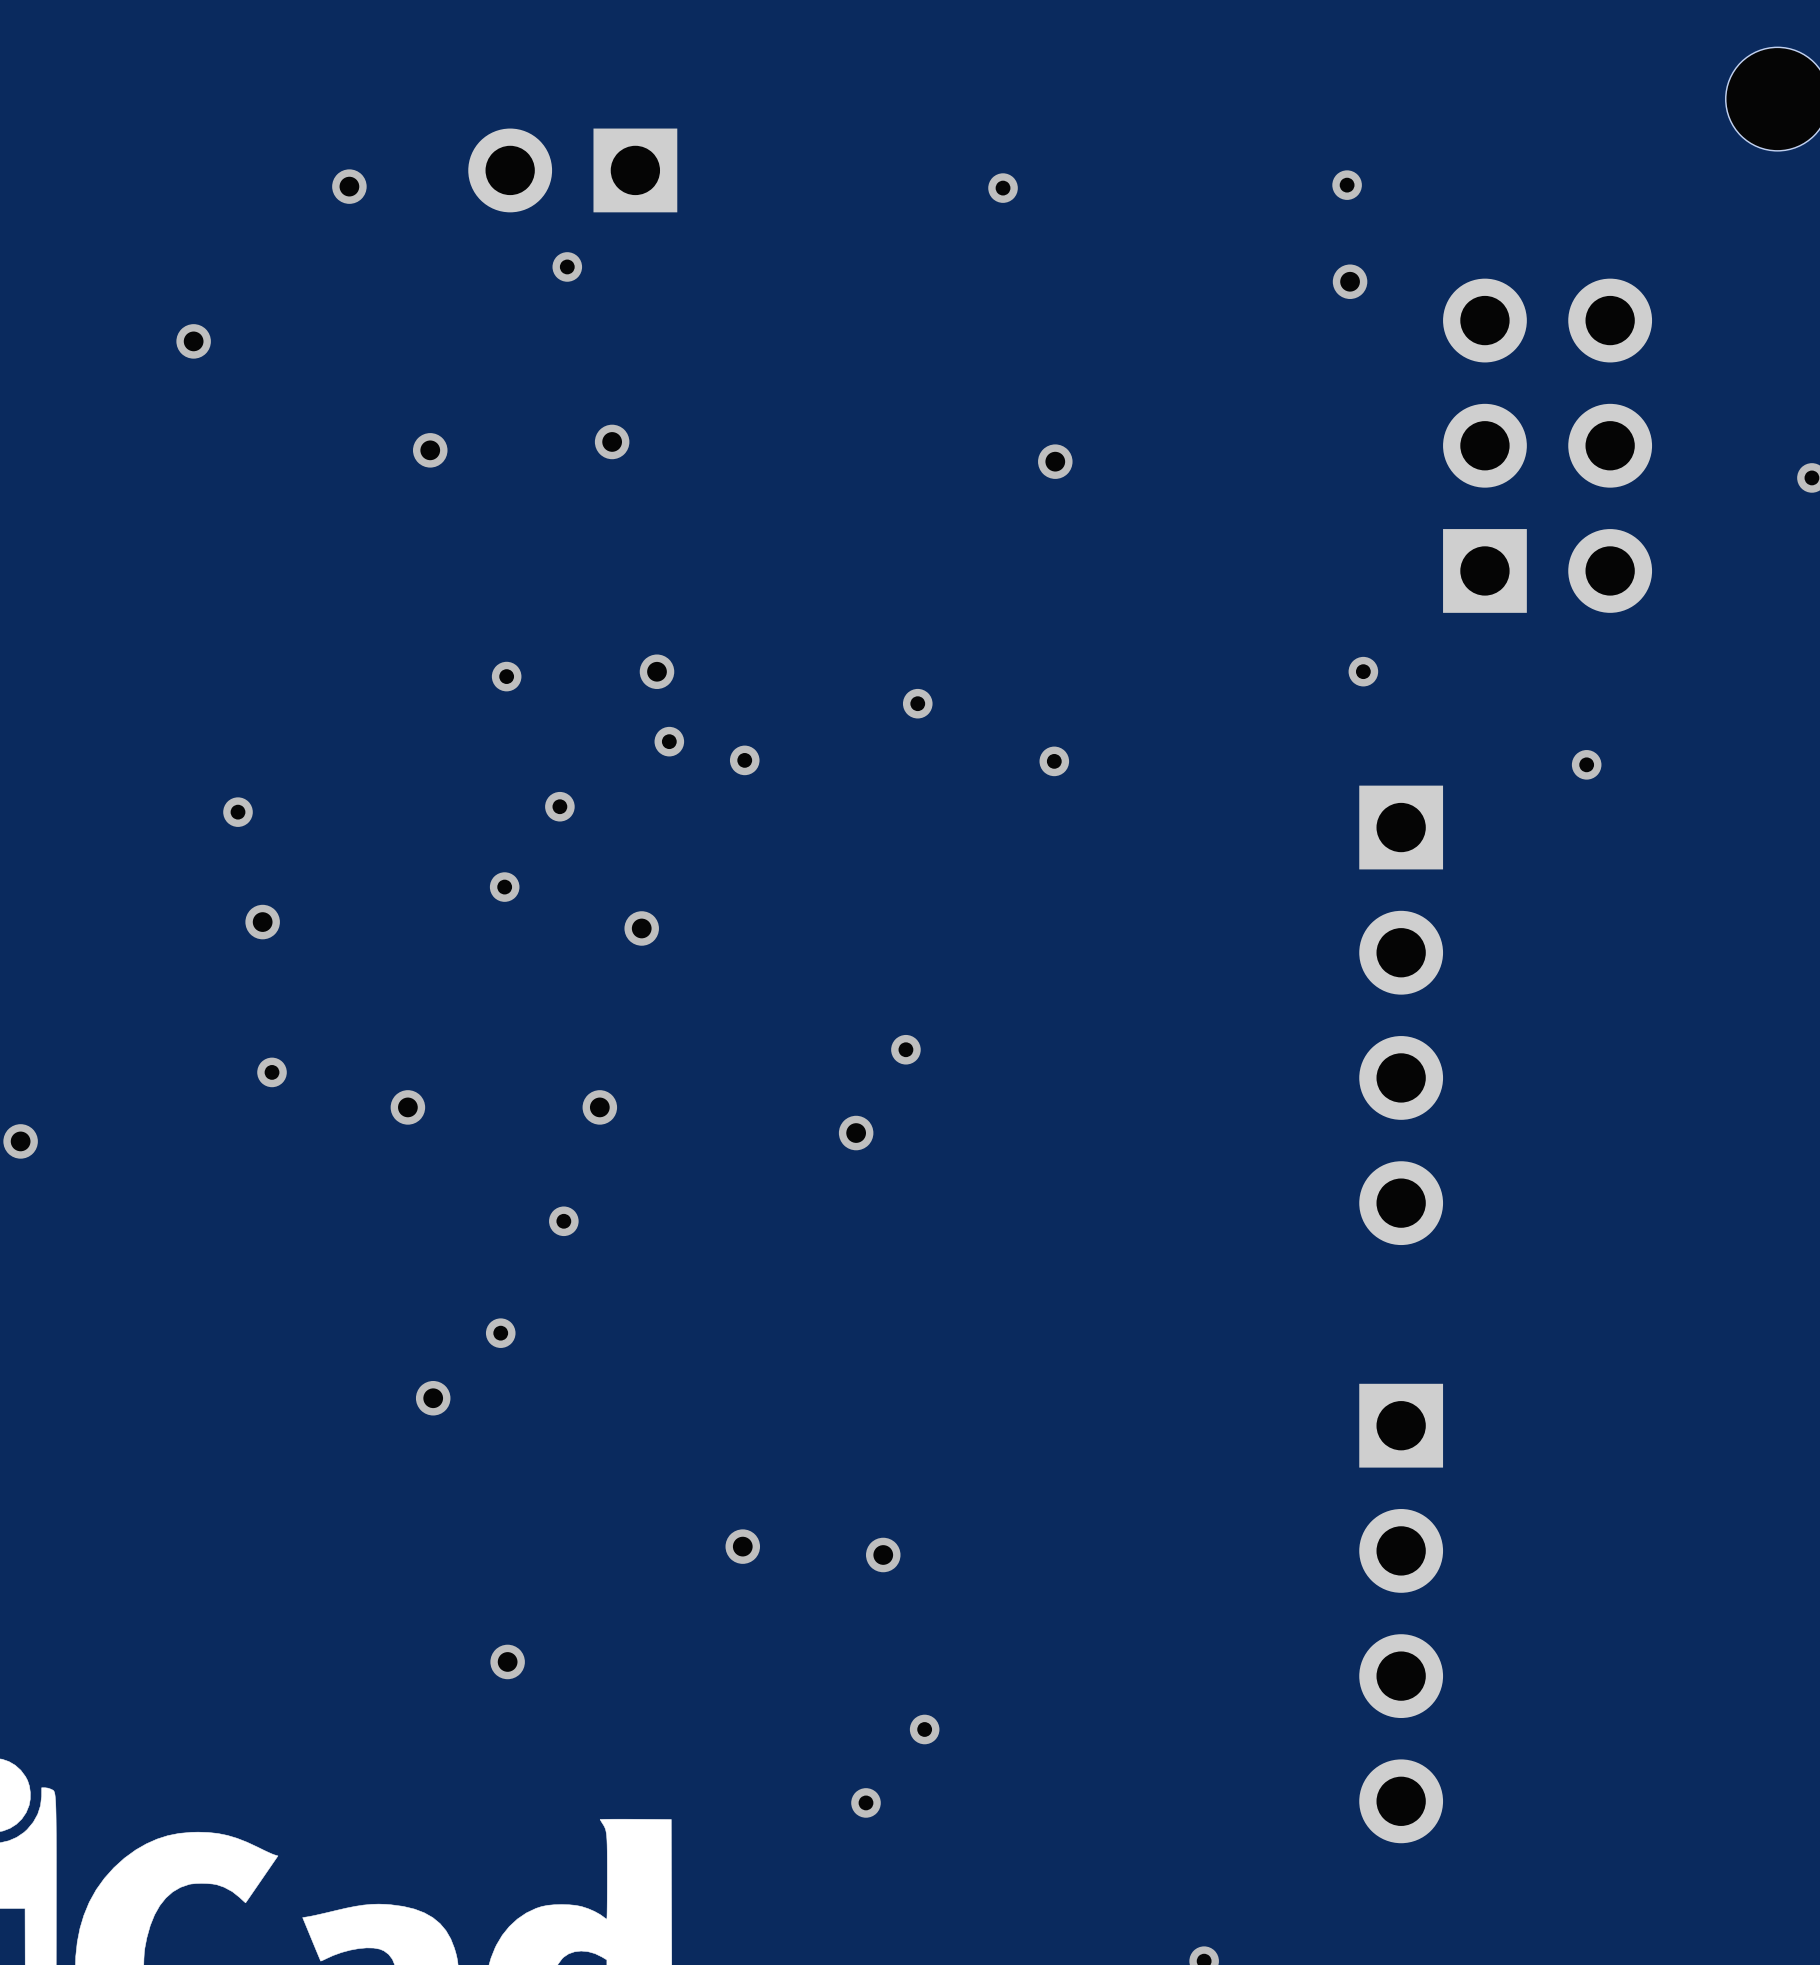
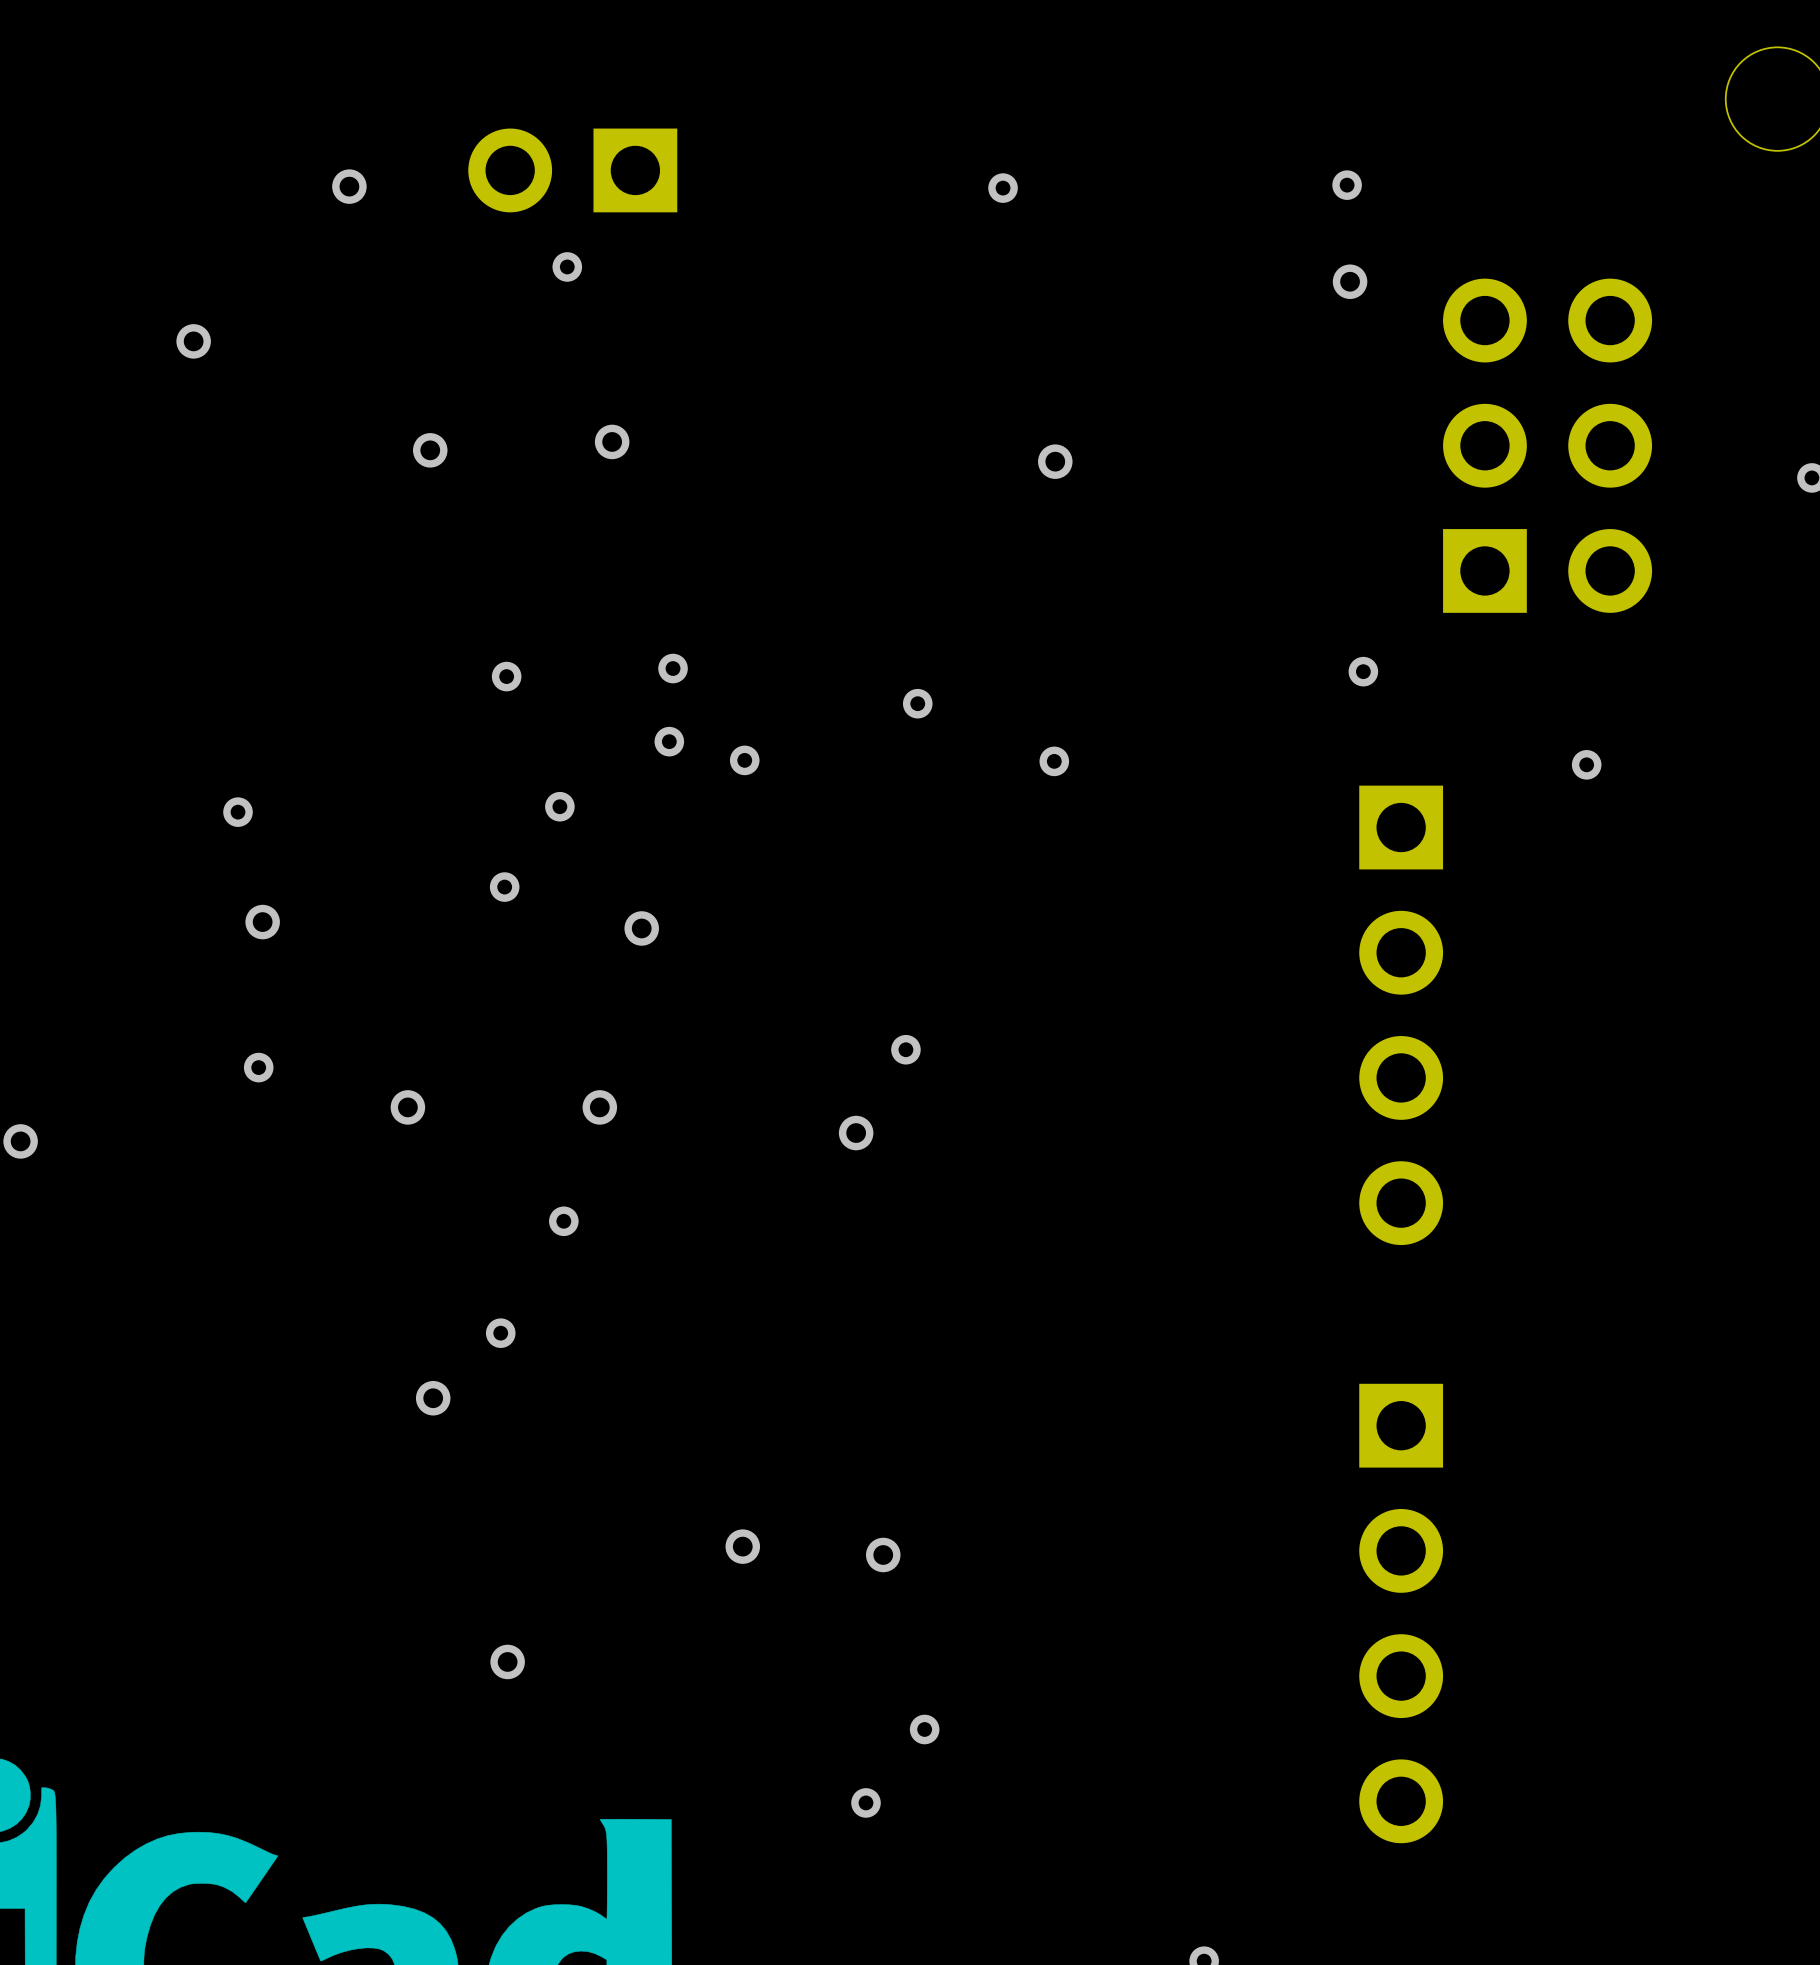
via position: (657, 671) -> (673, 668)
via position: (272, 1072) -> (258, 1067)

